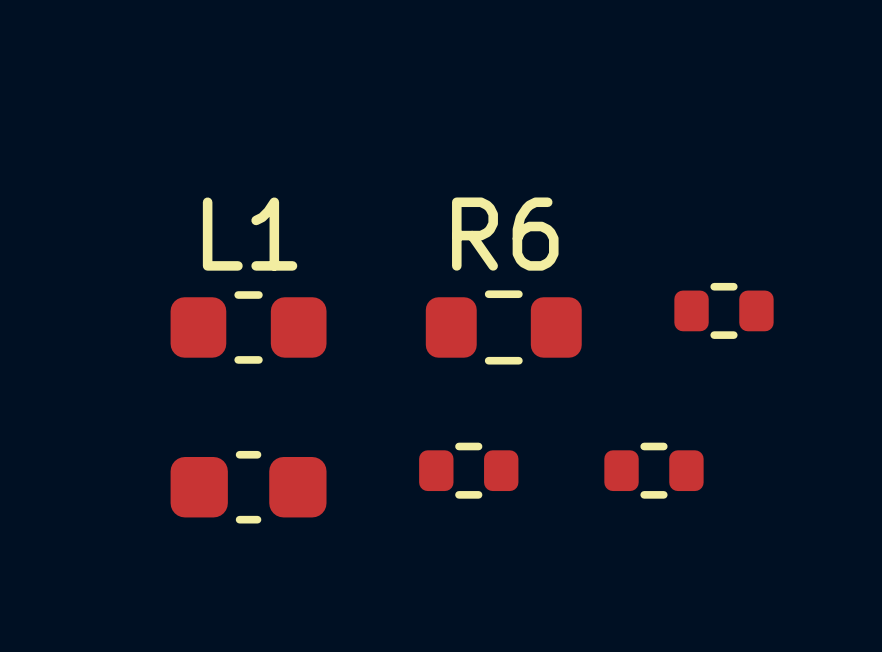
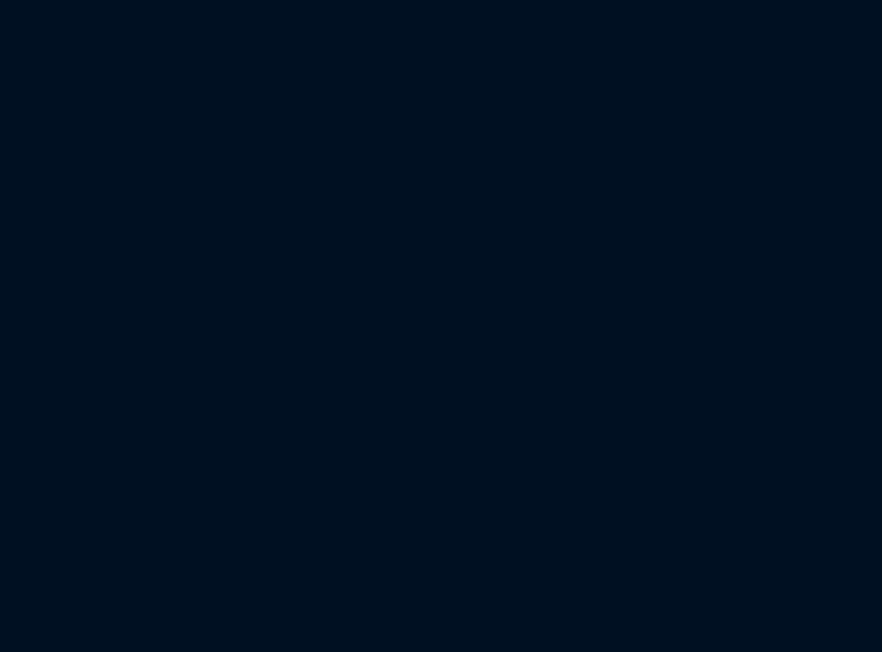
part: (723, 310) -> none
L1: (248, 327) -> none
R6: (503, 327) -> none
part: (468, 470) -> none
part: (653, 470) -> none
part: (248, 487) -> none

